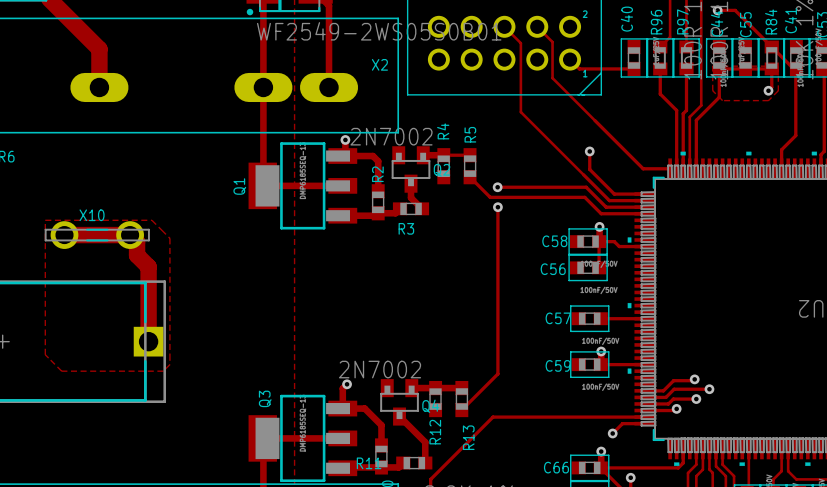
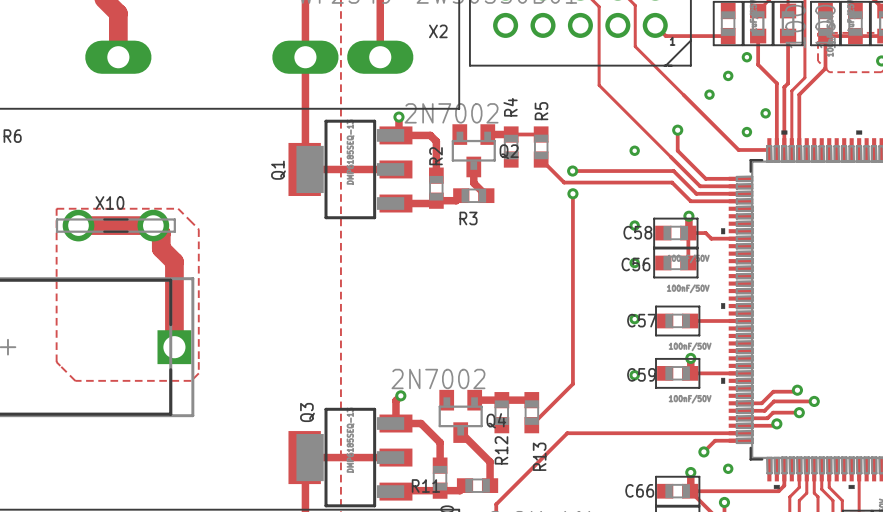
via: none -> (746, 57)
via: none -> (728, 75)
via: none -> (709, 94)
via: none -> (765, 113)
via: none -> (746, 132)
via: none -> (634, 150)
via: none -> (634, 225)
via: none -> (634, 263)
via: none -> (634, 319)
via: none -> (634, 375)
via: none -> (728, 468)

